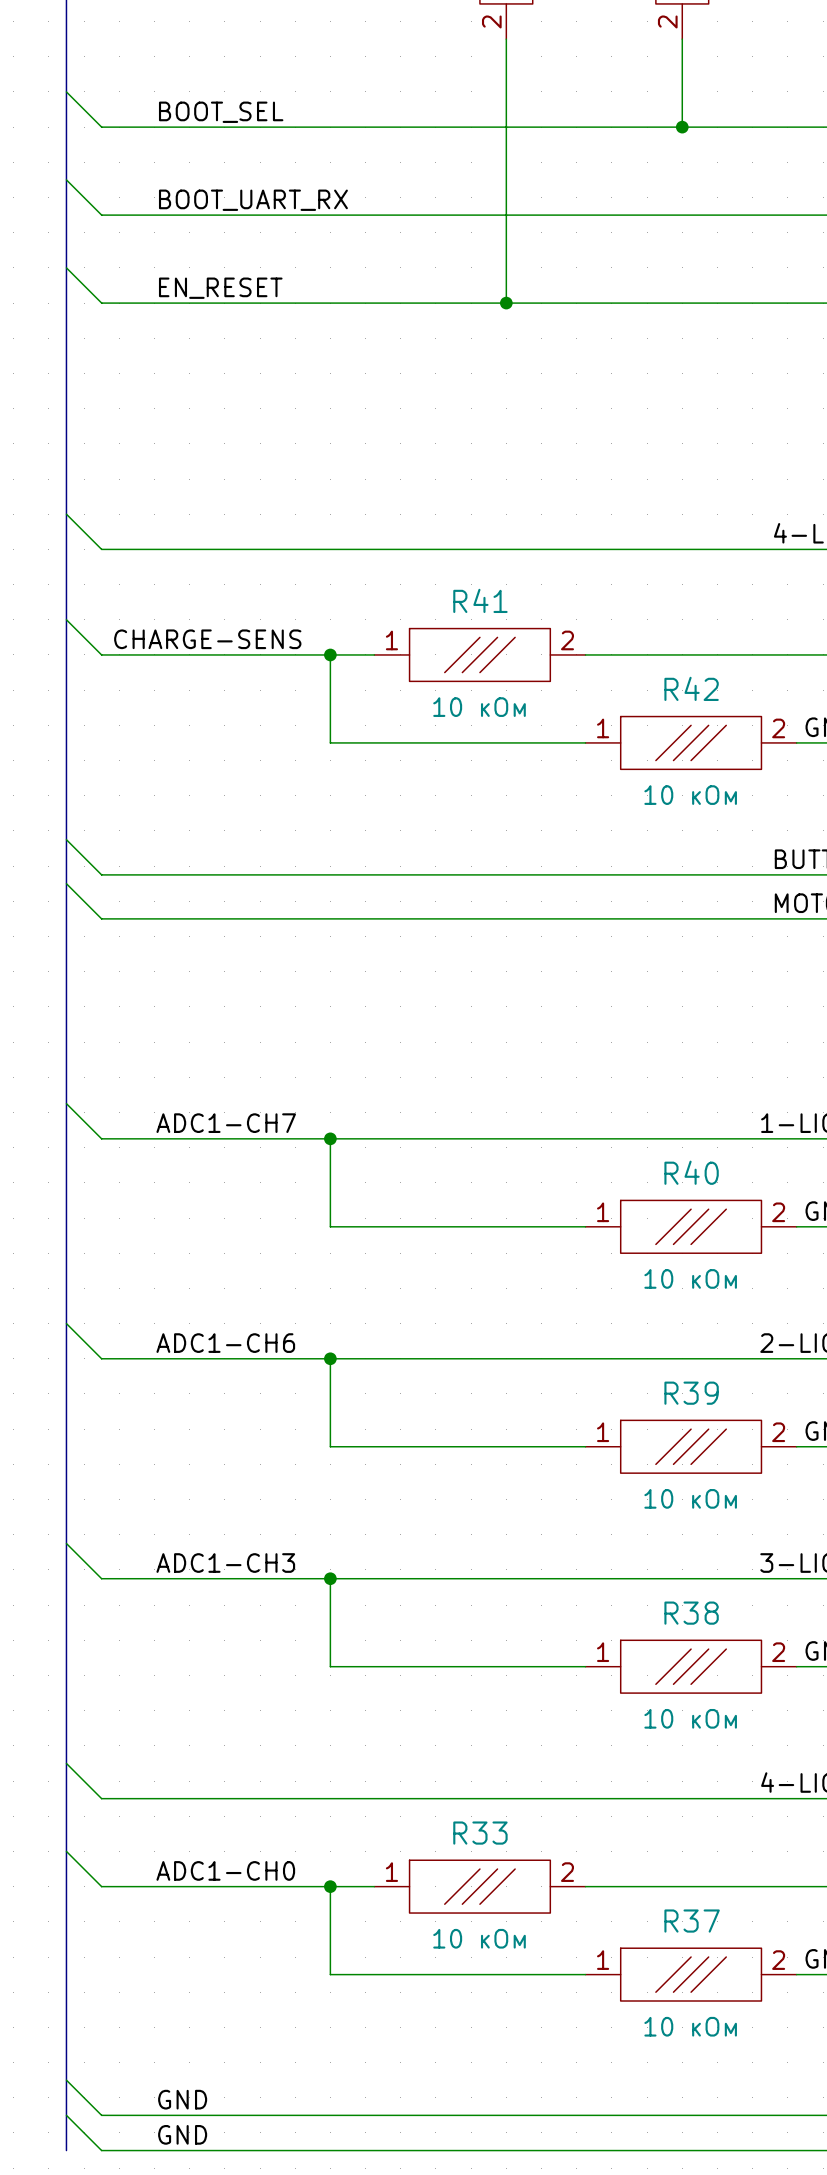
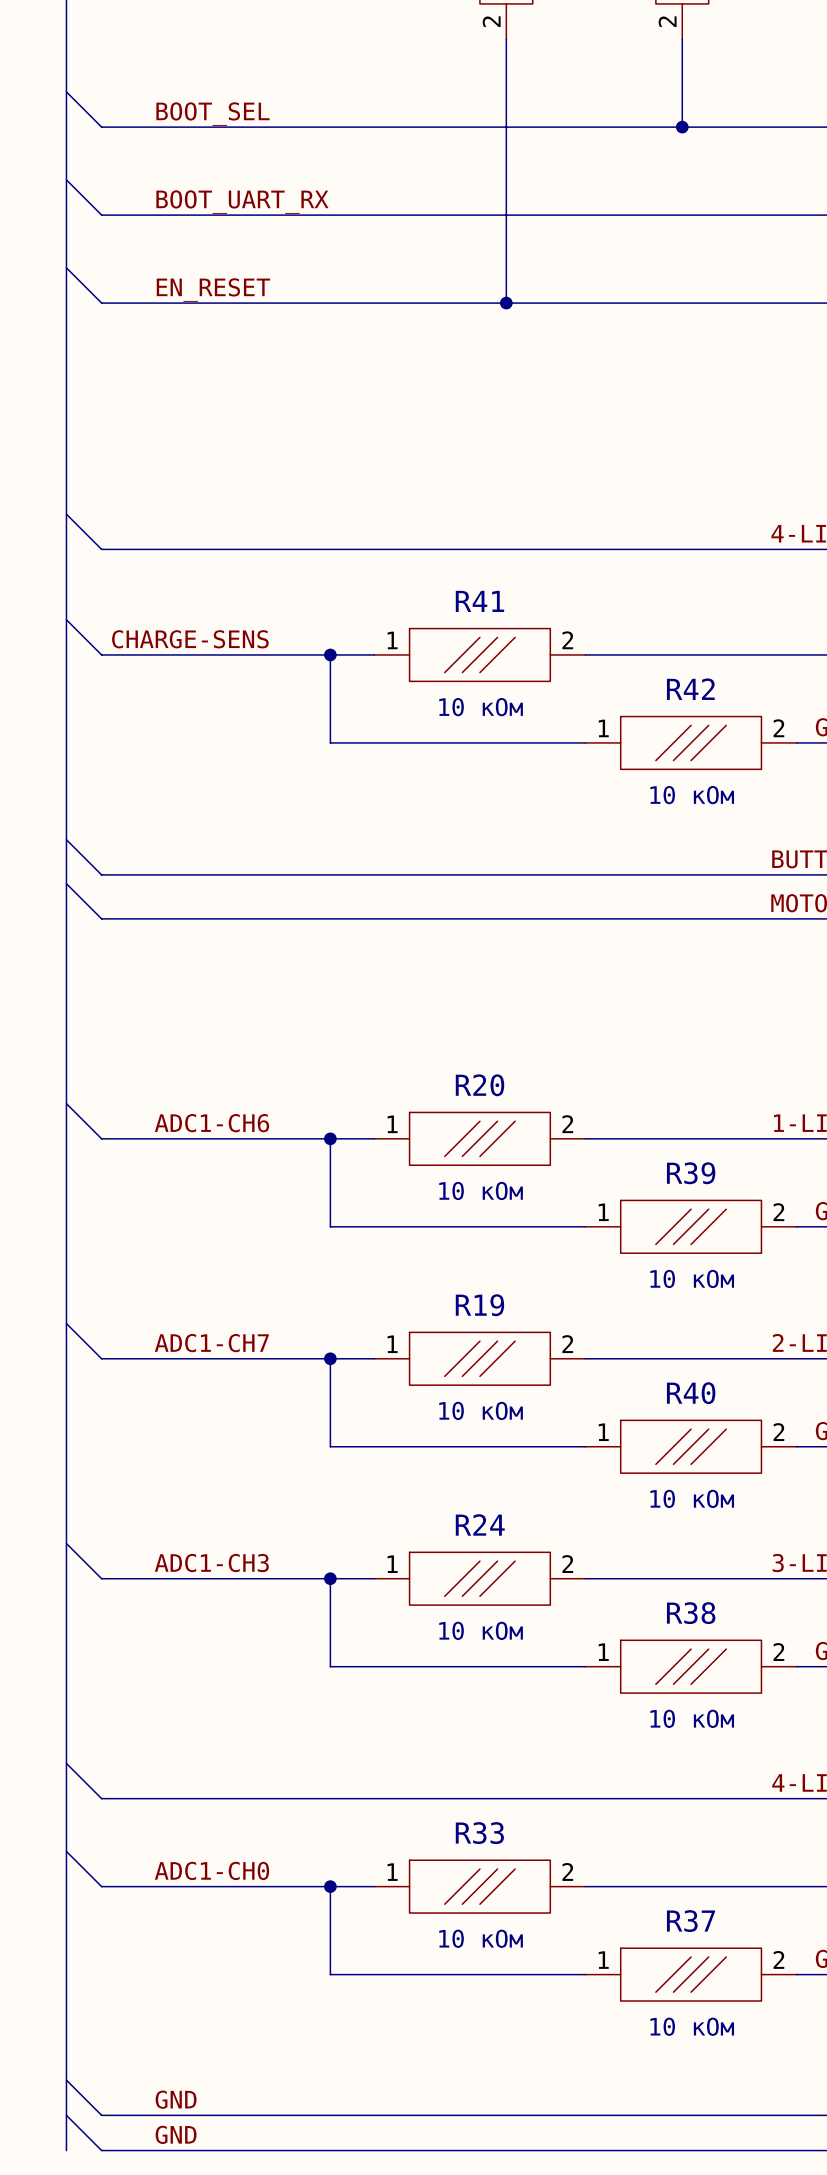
label: ADC1-CH7 (226, 1123) -> ADC1-CH6 (211, 1123)
wire: (374, 1138) (585, 1138) -> none
R20: none -> (479, 1138)
R40 name: R40 (691, 1172) -> R39 (691, 1173)
label: ADC1-CH6 (225, 1343) -> ADC1-CH7 (211, 1343)
wire: (374, 1358) (585, 1358) -> none
R19: none -> (479, 1358)
R39 name: R39 (691, 1393) -> R40 (691, 1393)
wire: (374, 1578) (585, 1578) -> none
R24: none -> (479, 1578)

